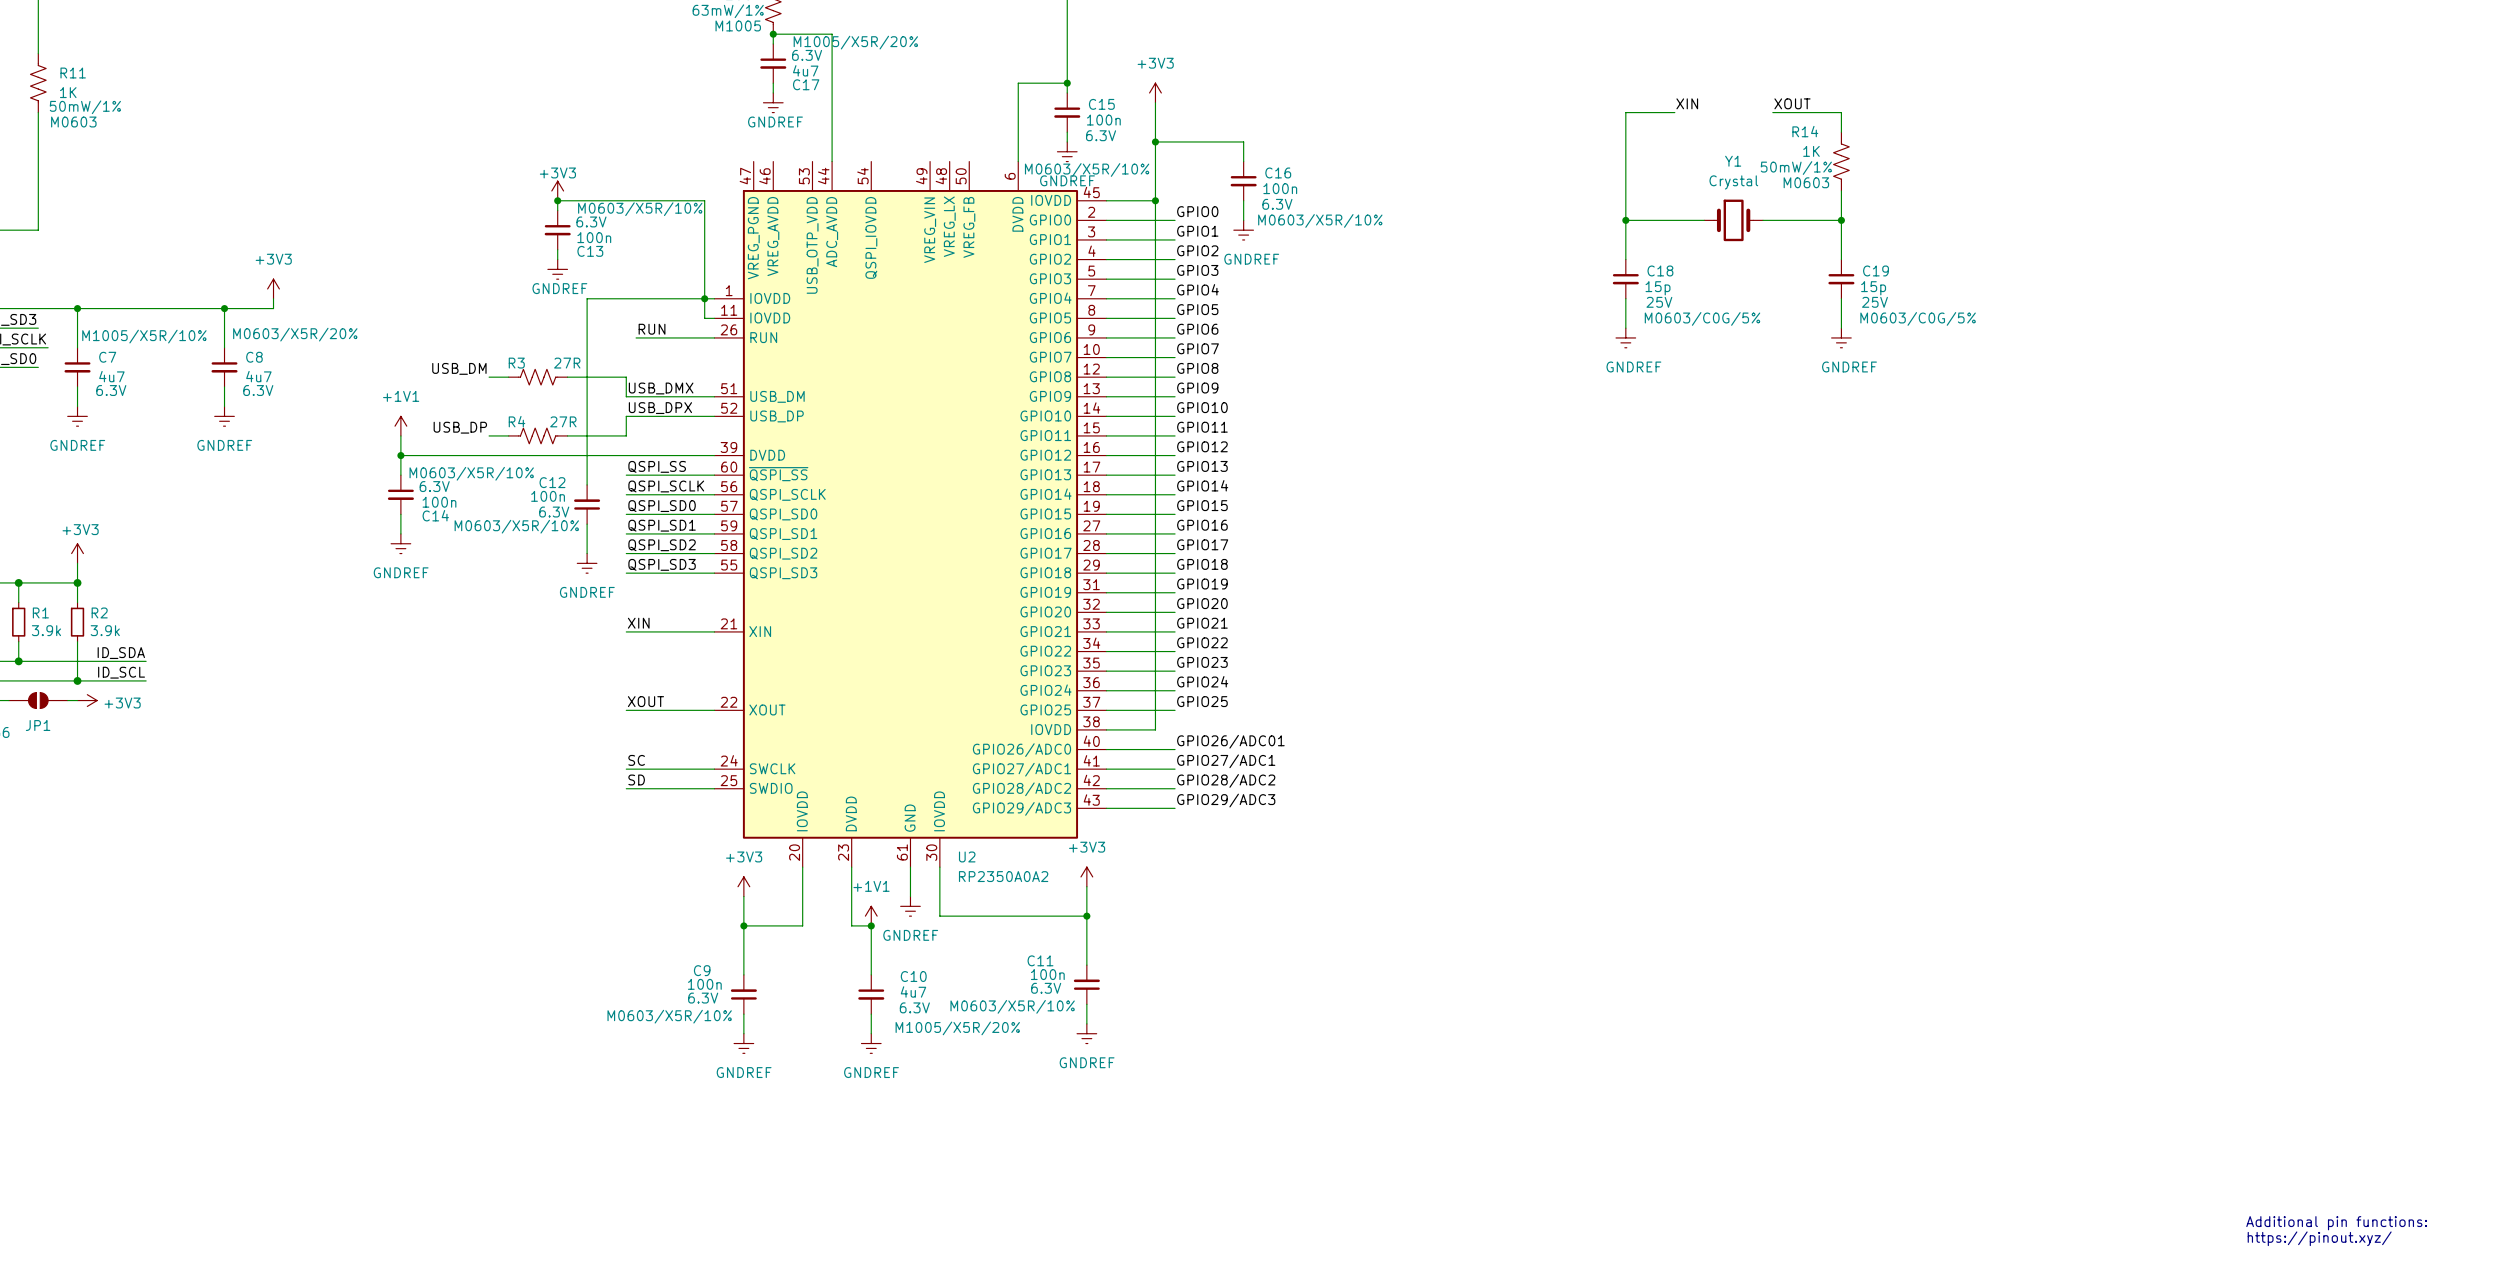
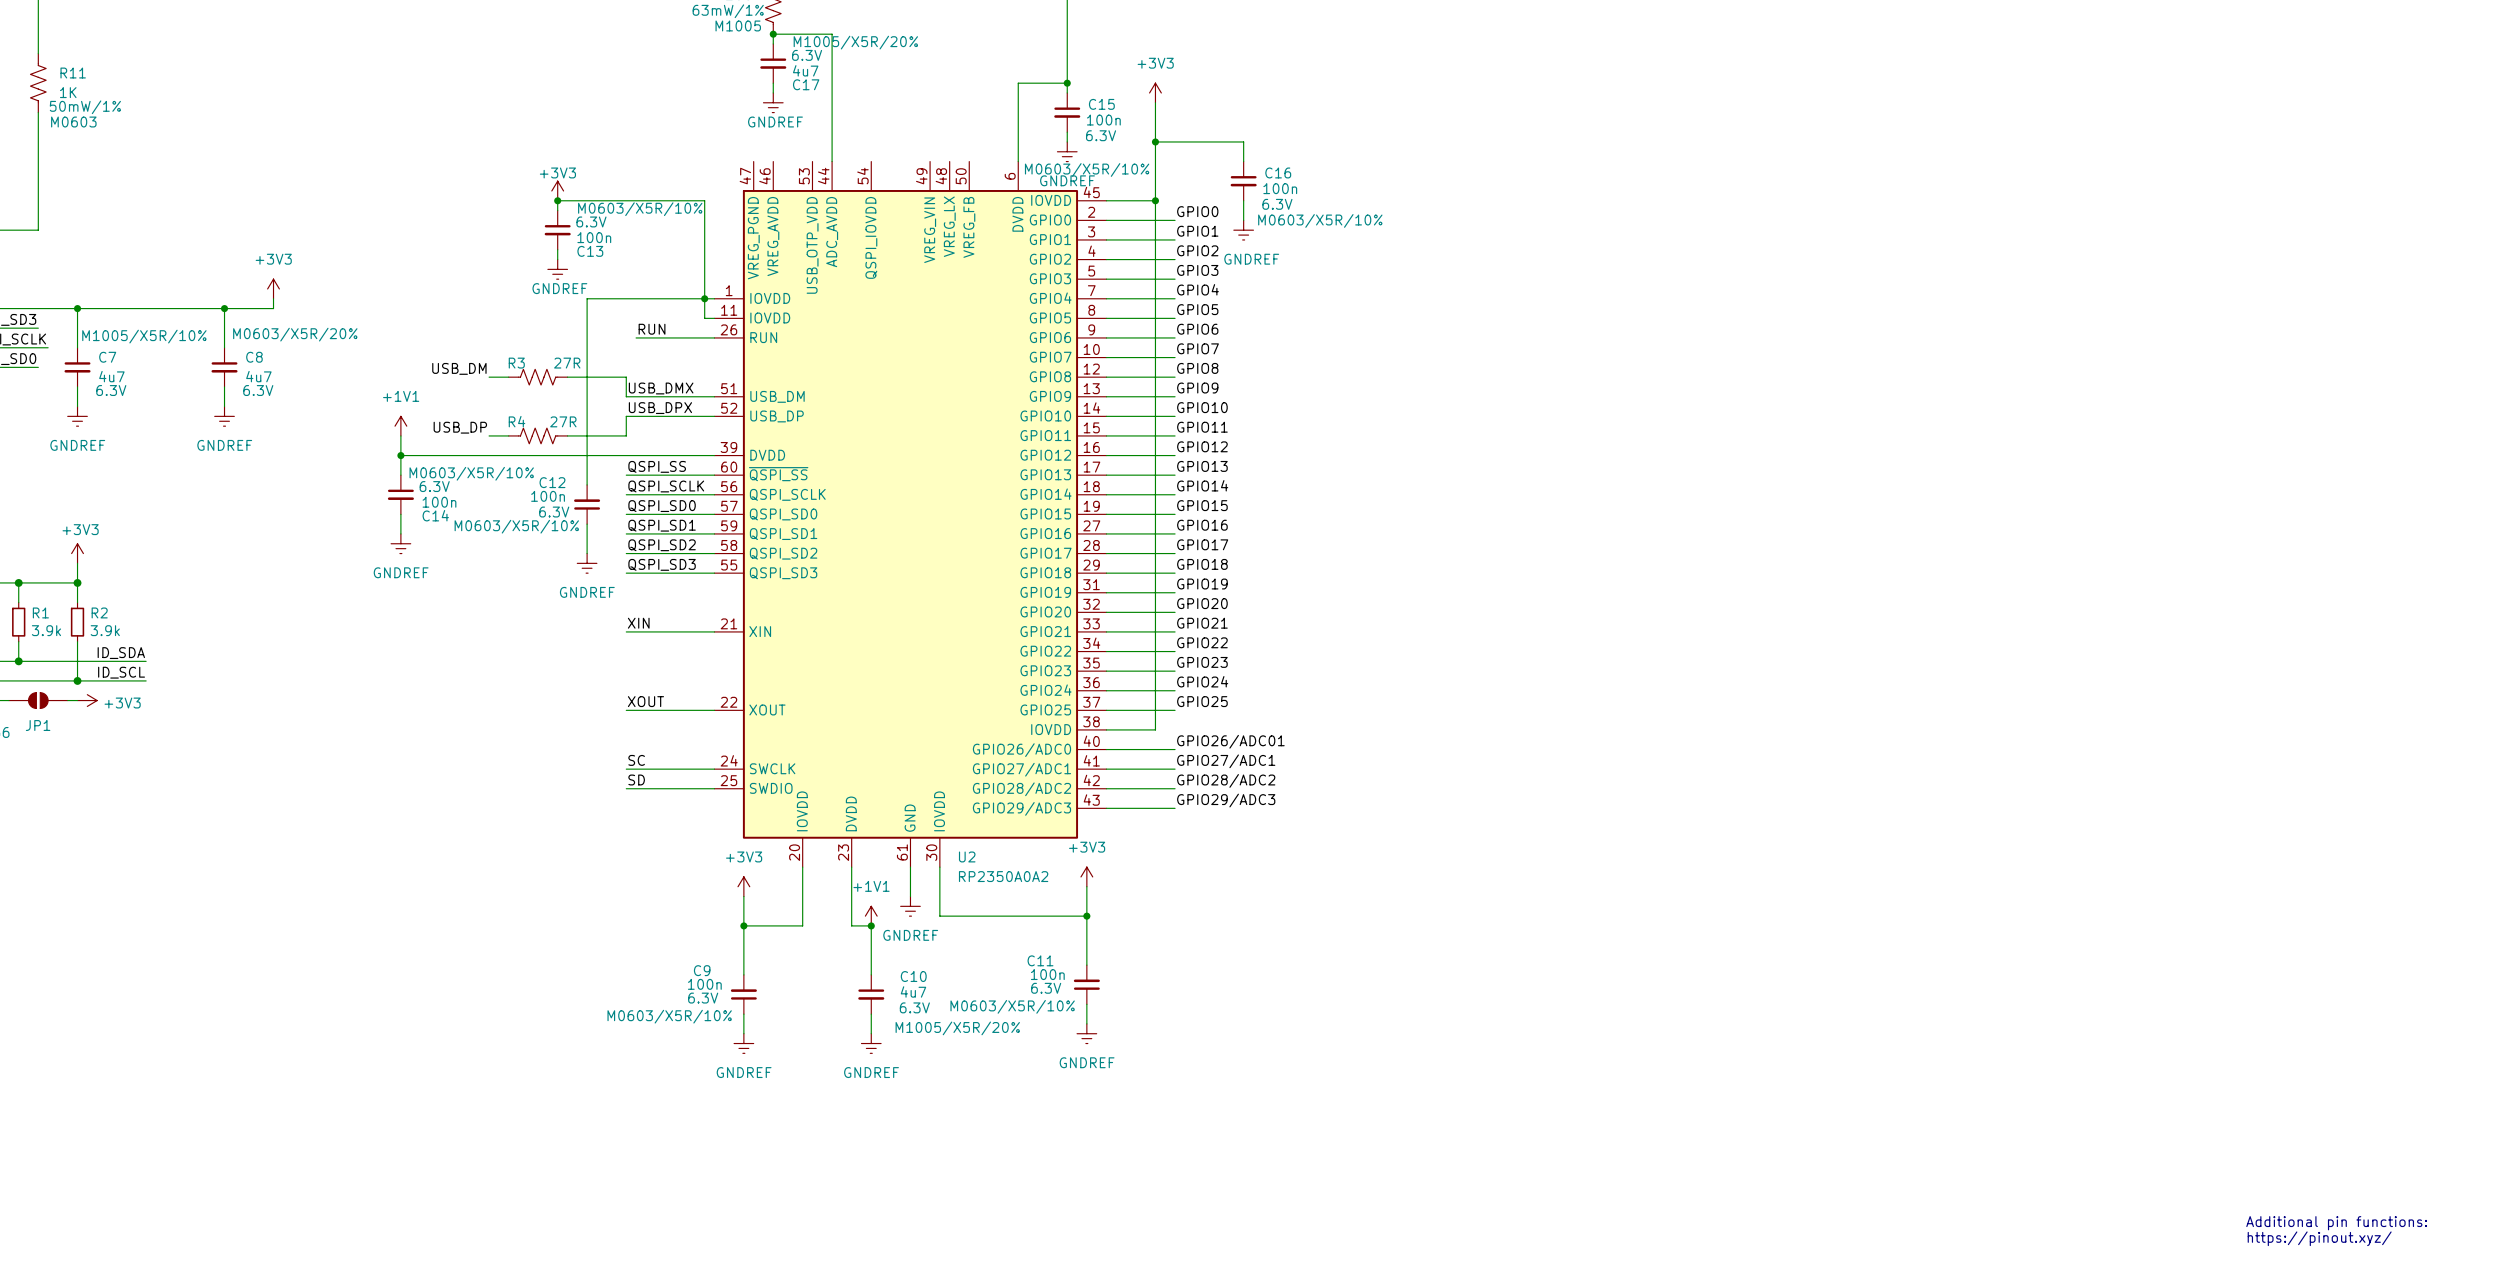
label: XIN (1687, 103) -> none
label: XOUT (1792, 103) -> none
wire: (1674, 112) (1625, 112) (1625, 259) -> none
wire: (1772, 112) (1841, 112) (1841, 132) -> none
R14: 1K (1841, 161) -> none
wire: (1841, 190) (1841, 259) -> none
wire: (1625, 220) (1704, 220) -> none
junction: (1625, 220) -> none
Y1: Crystal (1733, 220) -> none
wire: (1763, 220) (1841, 220) -> none
junction: (1841, 220) -> none
C18: 15p (1625, 279) -> none
C19: 15p (1841, 279) -> none
wire: (1625, 298) (1625, 328) -> none
wire: (1841, 298) (1841, 328) -> none
power symbol: GNDREF (1625, 337) -> none
power symbol: GNDREF (1841, 337) -> none

